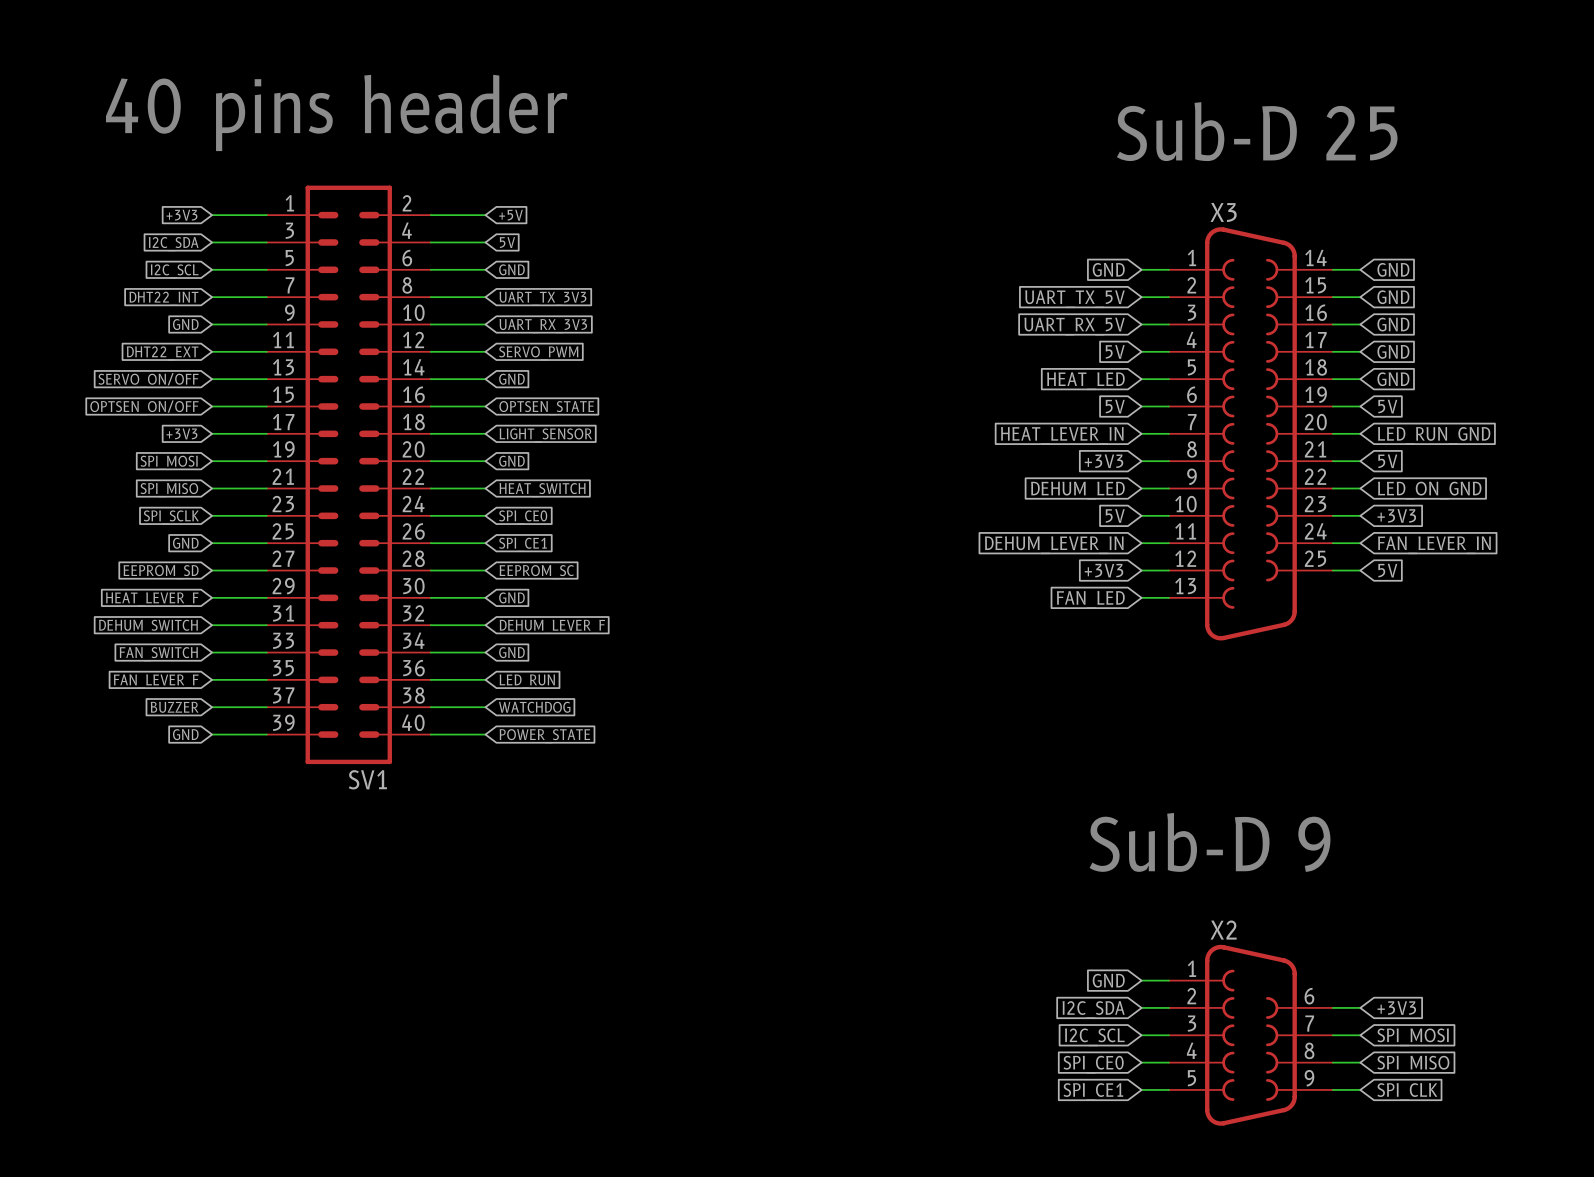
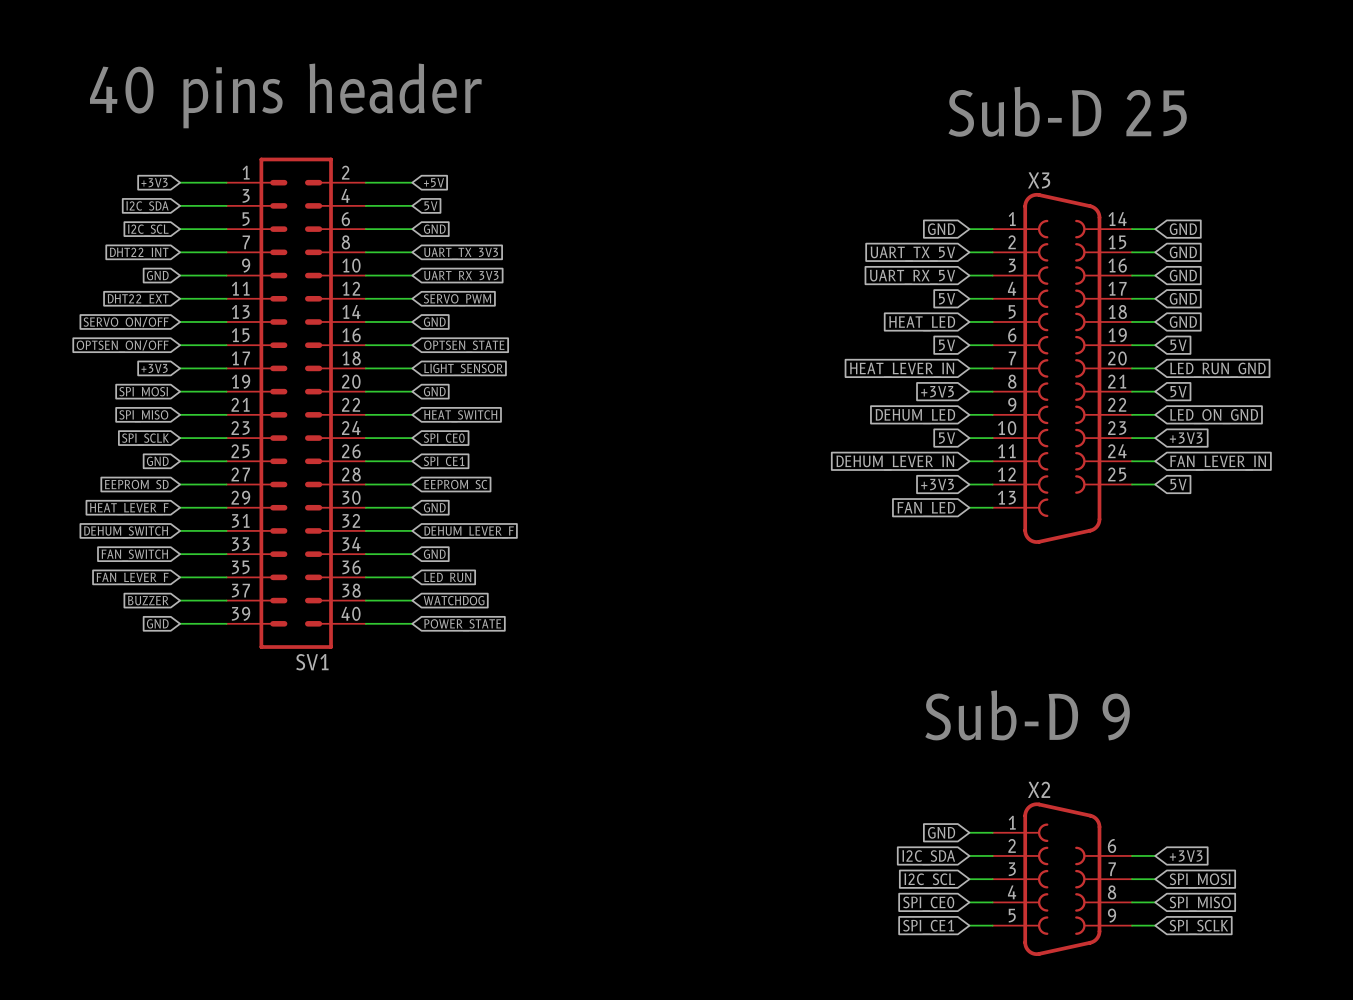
global label: SPI_CLK (1407, 1092) -> SPI_SCLK (1198, 927)

